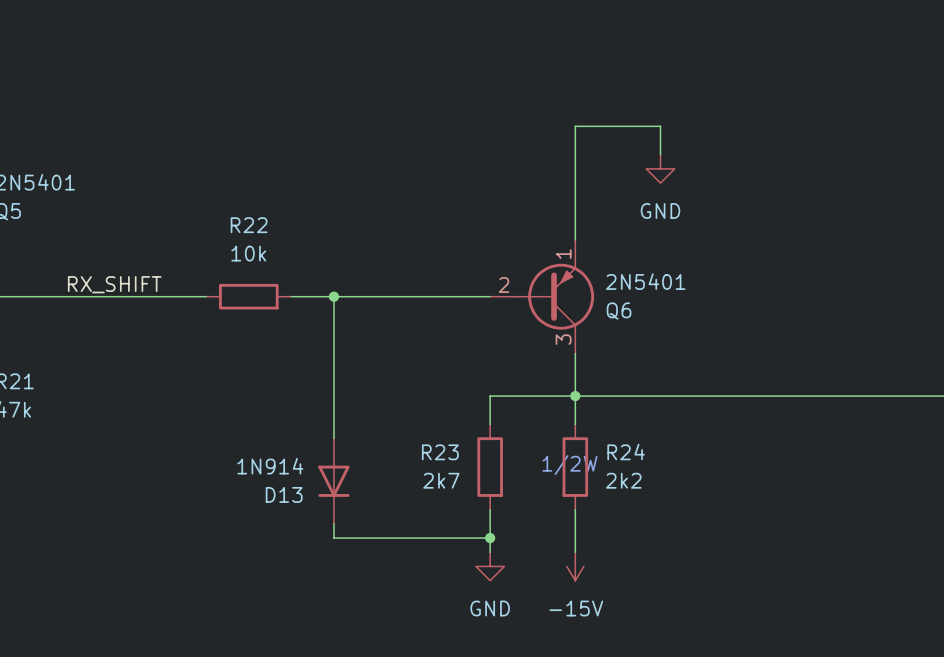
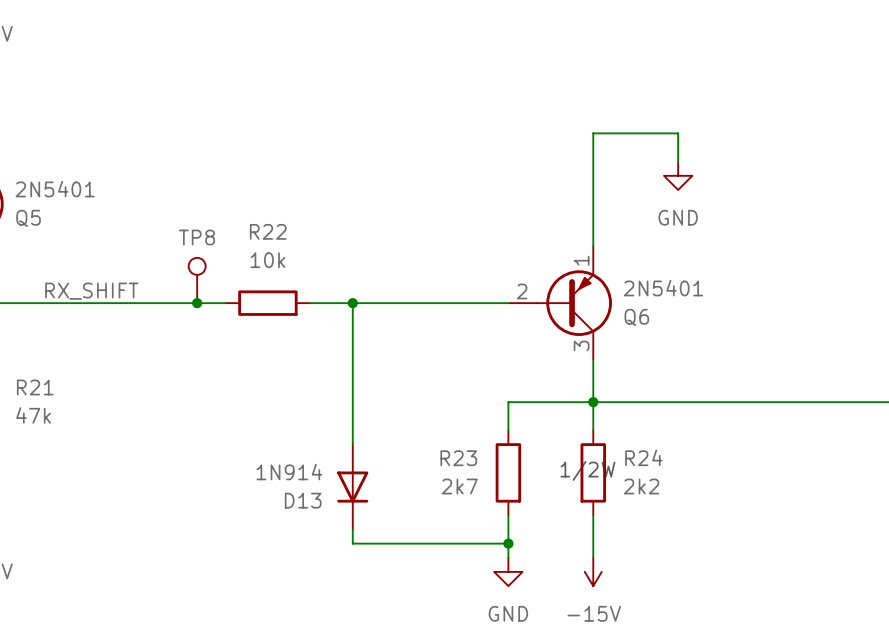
TP8: none -> (197, 280)
label position: RX_SHIFT (114, 284) -> RX_SHIFT (91, 291)
junction: none -> (197, 303)

